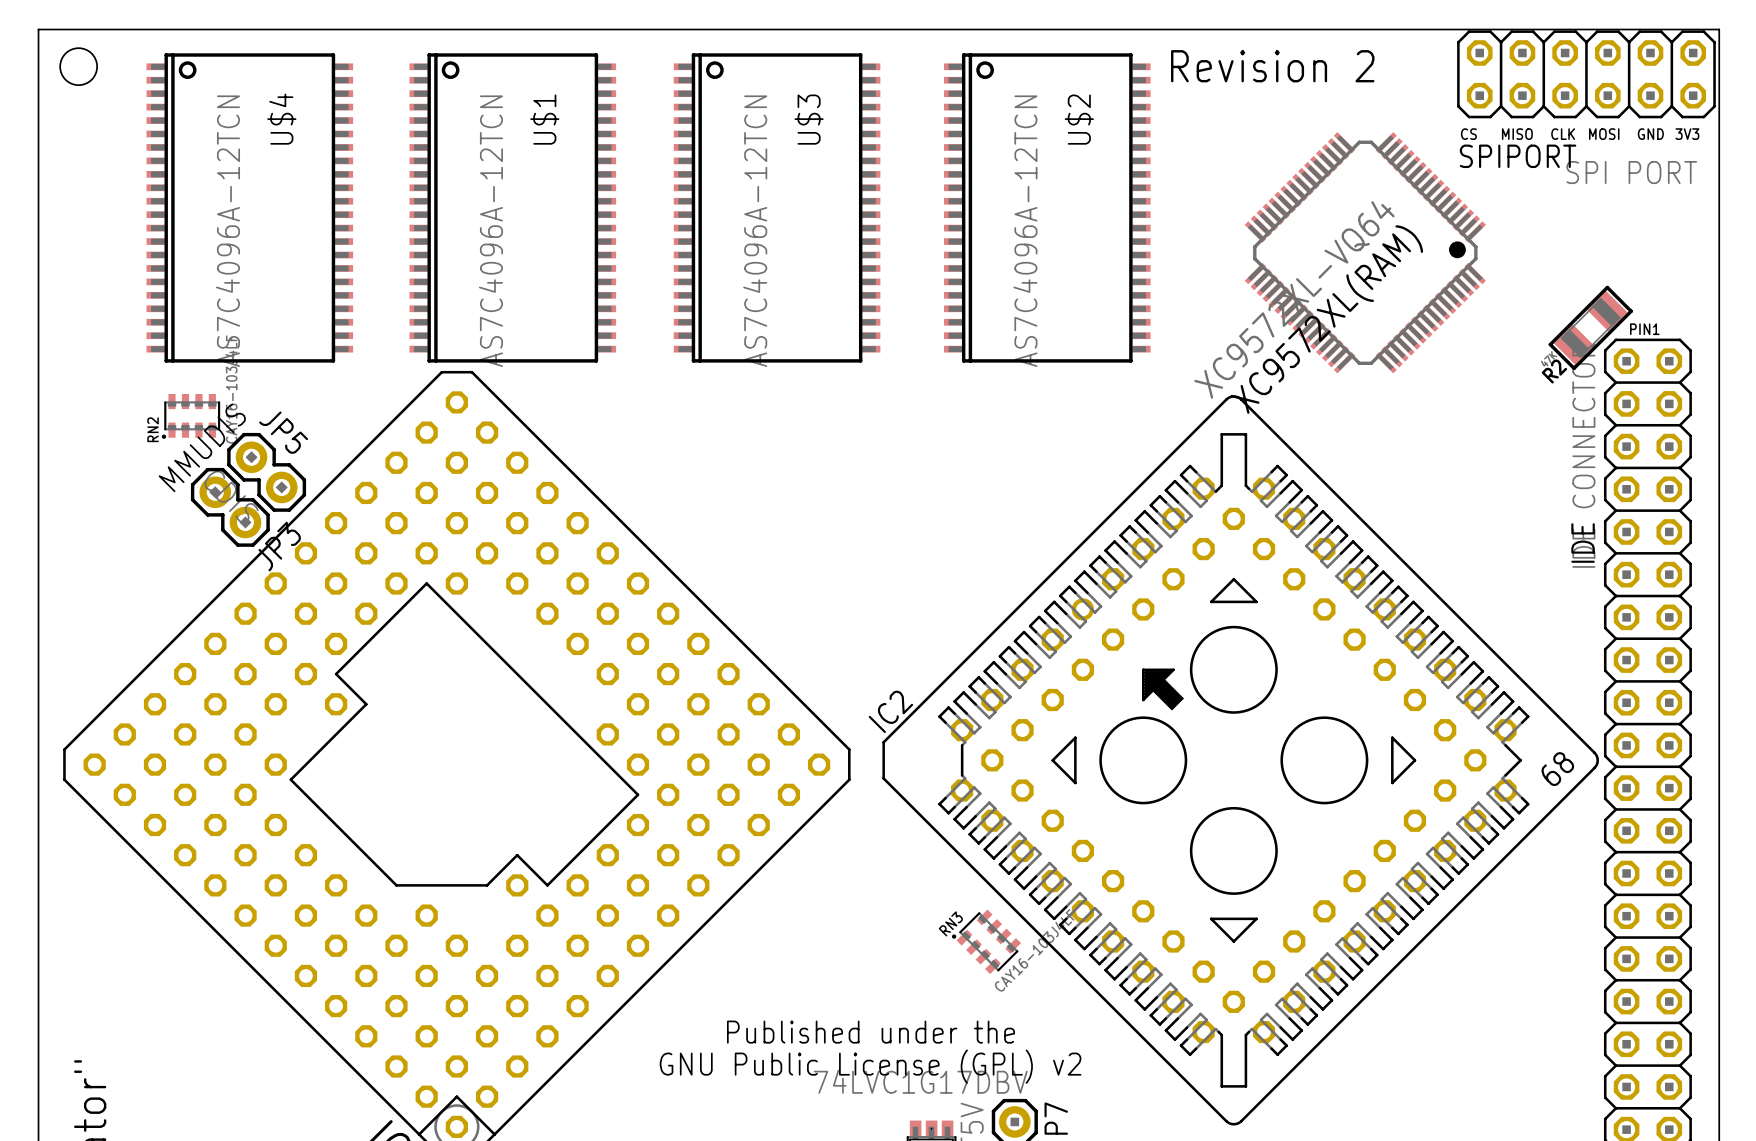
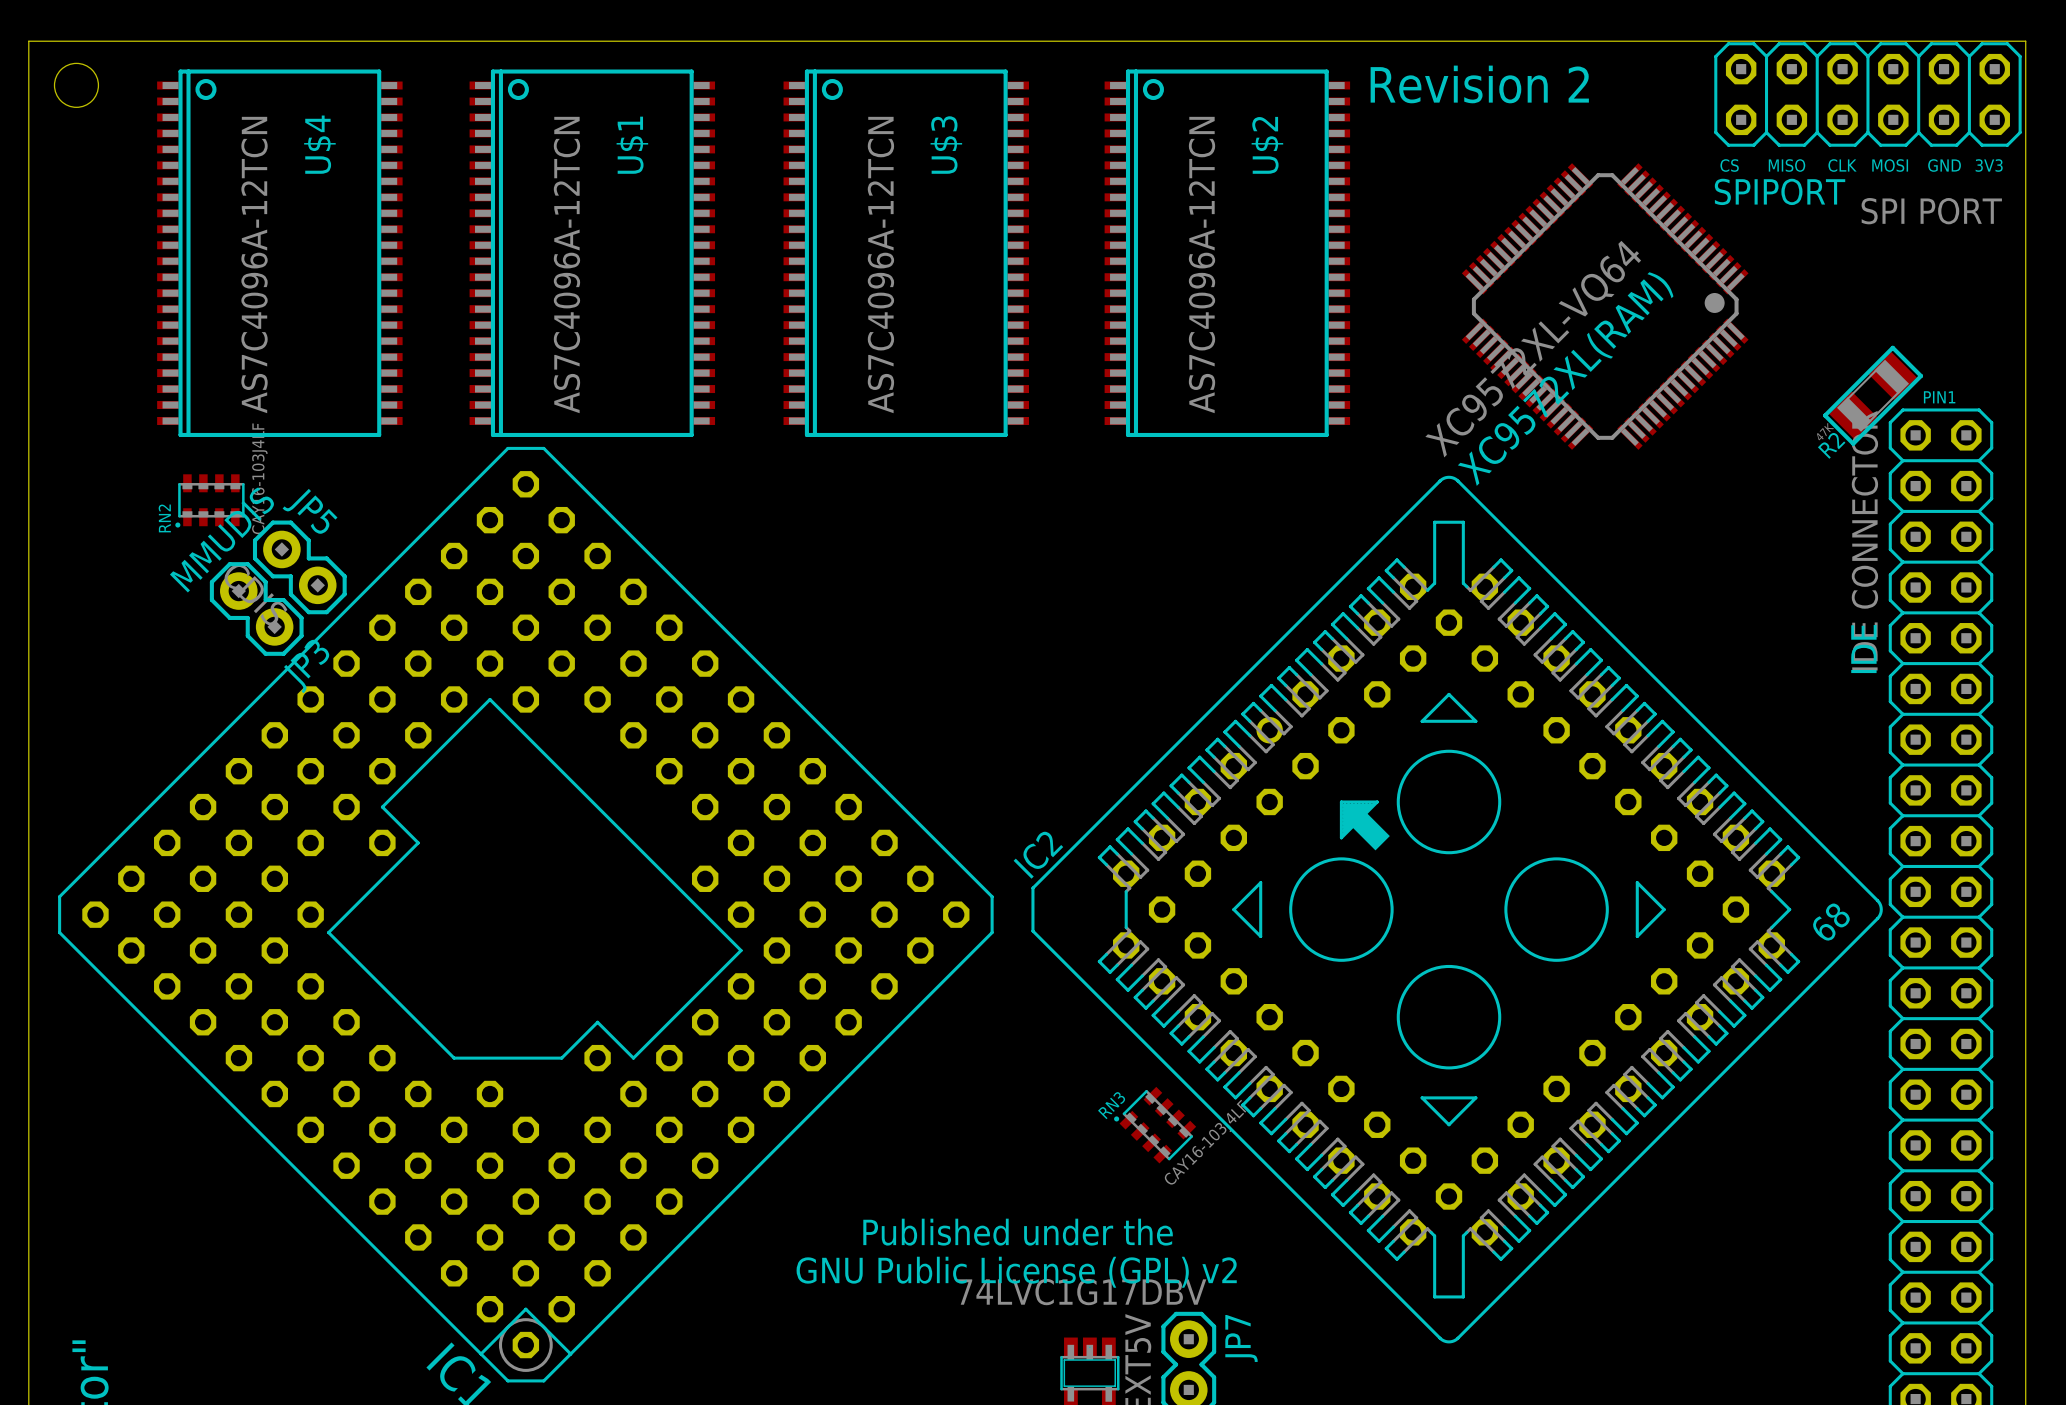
XC9572XL(RAM) footprint: [1244, 132, 1486, 374] -> [1461, 163, 1749, 450]

